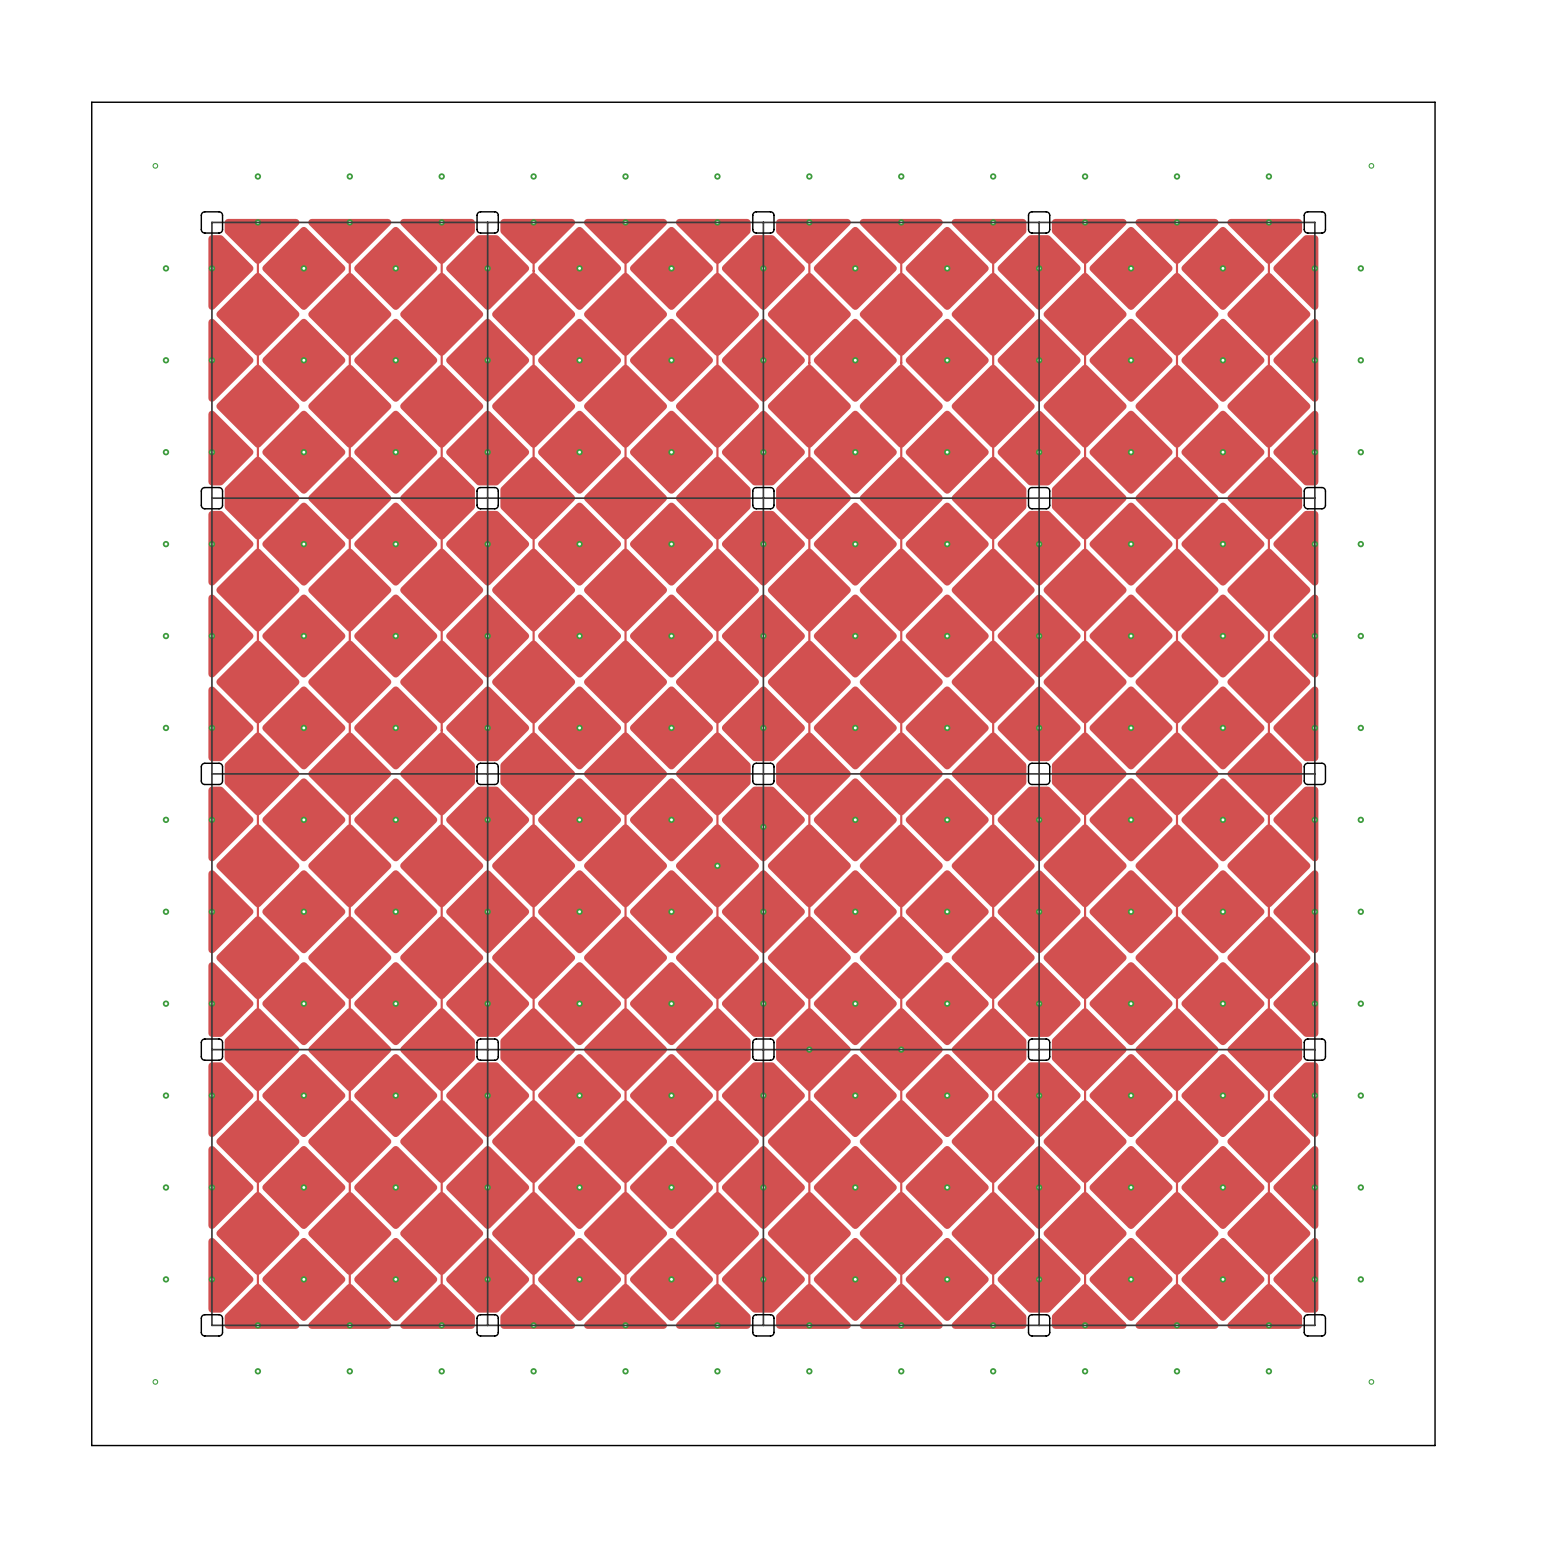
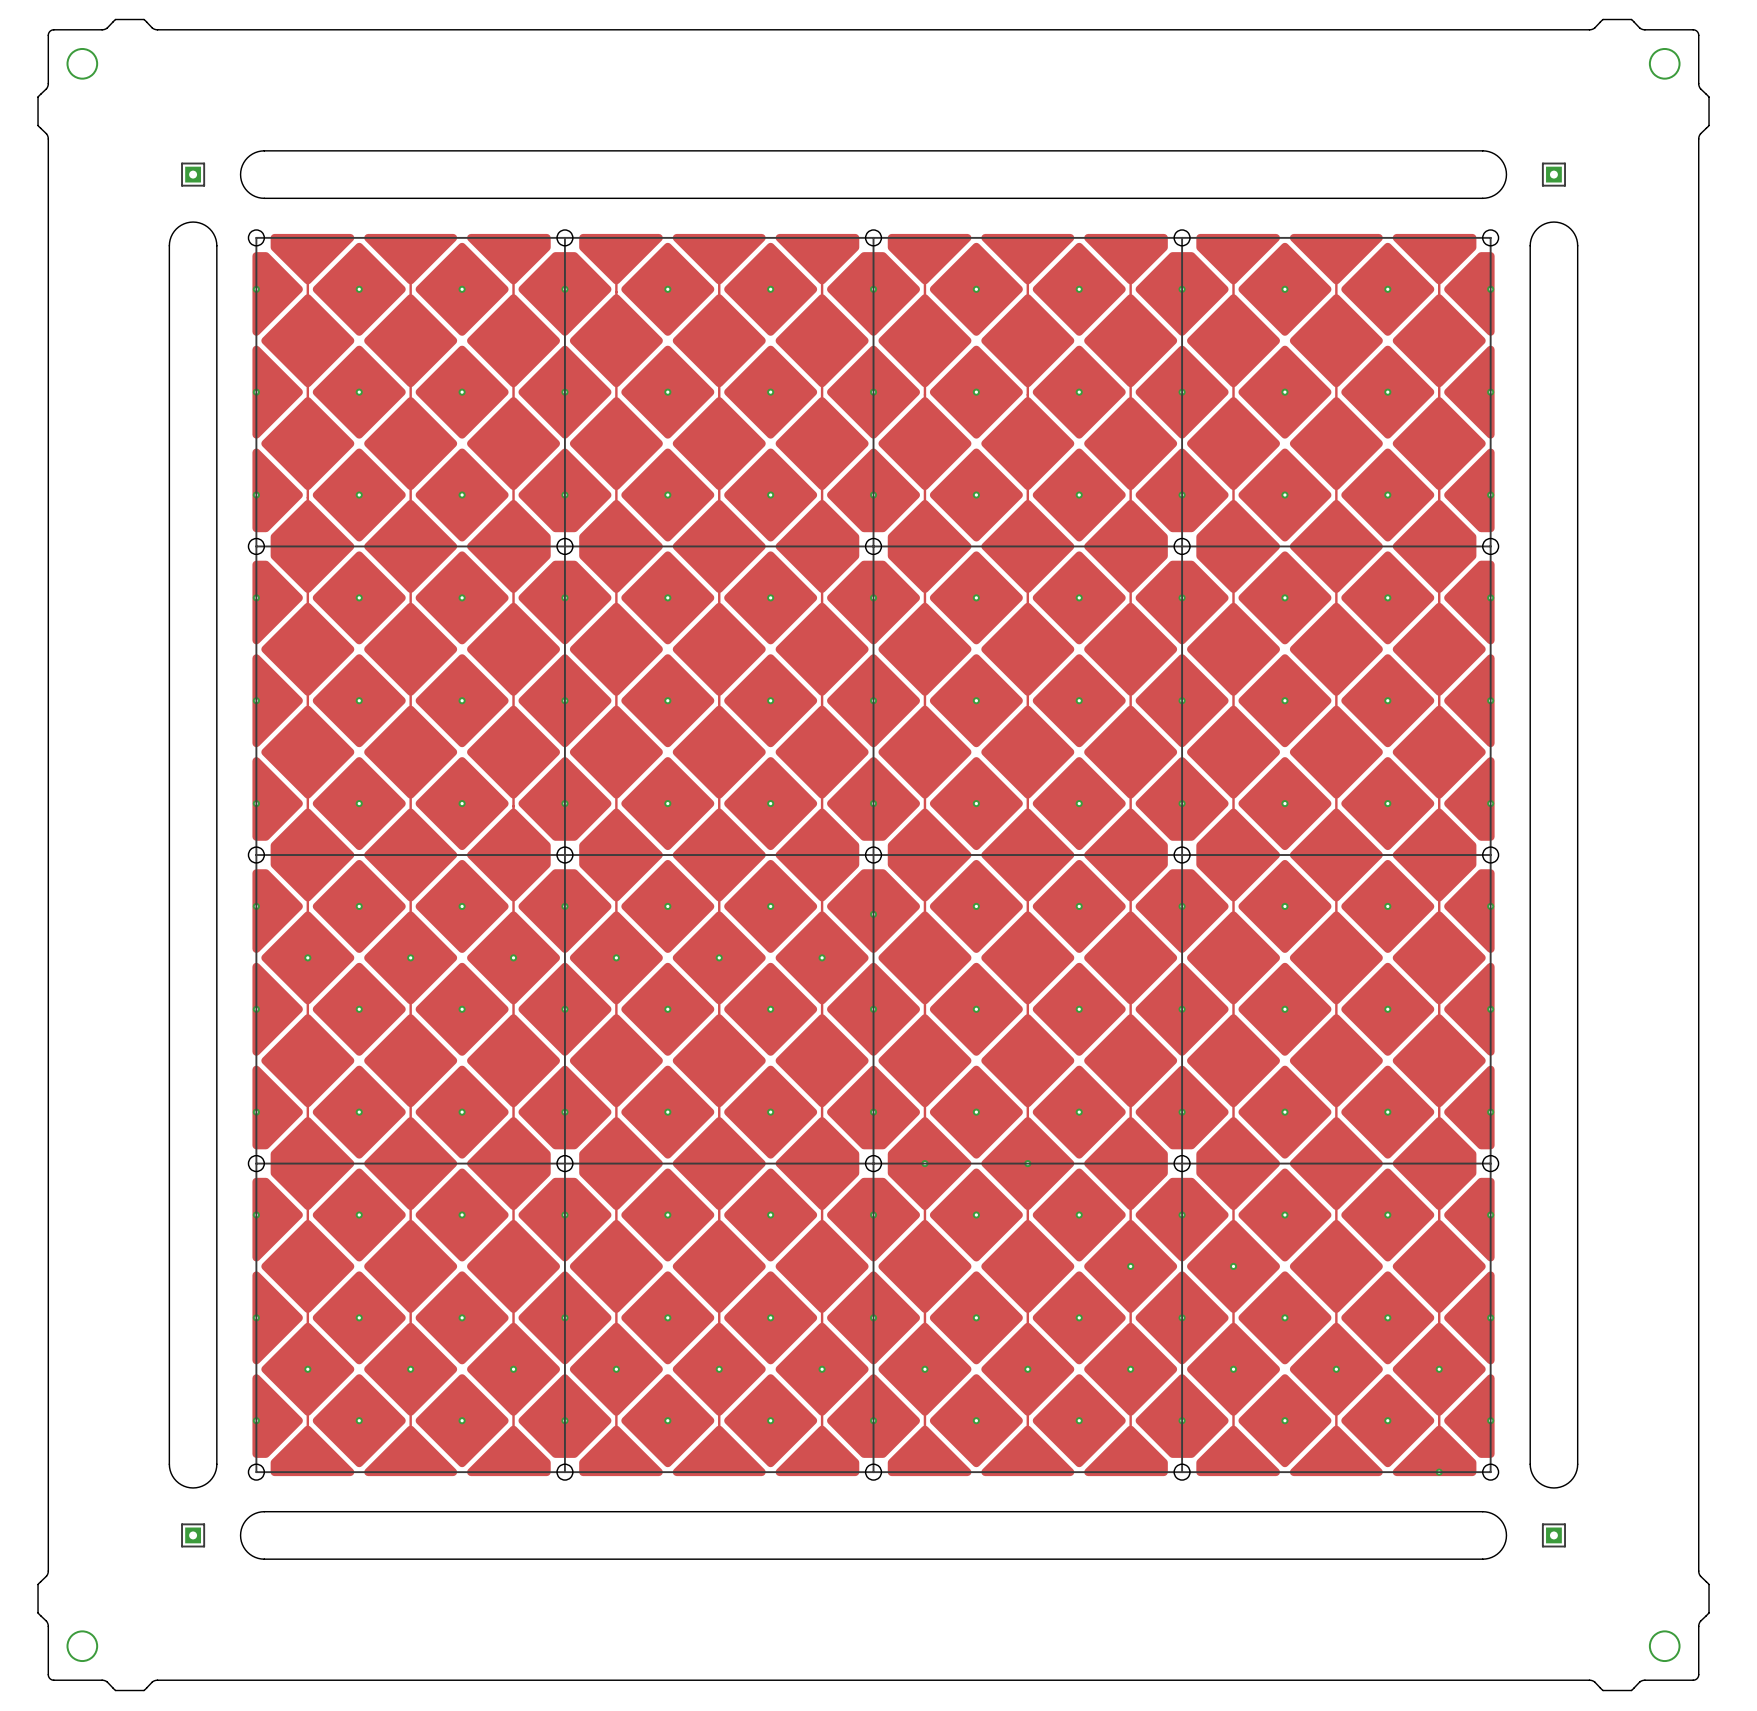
board edge: (91, 102) (1435, 102) (1435, 1445) (91, 1445) (91, 102) -> none
board edge: none -> (264, 150) (1482, 150) (1491, 152) (1499, 157) (1504, 165) (1506, 174) (1504, 183) (1499, 191) (1491, 196) (1482, 198) (264, 198) (255, 196) (247, 191) (242, 183) (240, 174) (242, 165) (247, 157) (255, 152) (264, 150)
via: (155, 165) -> none
part: none -> (193, 174)
via: (1371, 165) -> none
part: none -> (1553, 174)
via: (257, 176) -> none
via: (349, 176) -> none
via: (441, 176) -> none
via: (533, 176) -> none
via: (625, 176) -> none
via: (717, 176) -> none
via: (809, 176) -> none
via: (901, 176) -> none
via: (993, 176) -> none
via: (1085, 176) -> none
via: (1176, 176) -> none
via: (1268, 176) -> none
board edge: (204, 211) (221, 213) (221, 232) (202, 231) (201, 214) (204, 211) -> none
board edge: (480, 211) (497, 213) (496, 232) (477, 231) (477, 214) (480, 211) -> none
board edge: (756, 211) (773, 213) (772, 232) (753, 231) (752, 214) (756, 211) -> none
board edge: (1032, 211) (1048, 213) (1048, 232) (1029, 231) (1028, 214) (1032, 211) -> none
board edge: (1307, 211) (1324, 213) (1324, 232) (1305, 231) (1304, 214) (1307, 211) -> none
round board edge: none -> [248, 229, 265, 247]
round board edge: none -> [556, 229, 574, 247]
round board edge: none -> [865, 229, 882, 247]
round board edge: none -> [1173, 229, 1191, 247]
round board edge: none -> [1482, 229, 1499, 247]
via: (257, 222) -> none
via: (349, 222) -> none
via: (441, 222) -> none
via: (533, 222) -> none
via: (625, 222) -> none
via: (717, 222) -> none
via: (809, 222) -> none
via: (901, 222) -> none
via: (993, 222) -> none
via: (1085, 222) -> none
via: (1176, 222) -> none
via: (1268, 222) -> none
board edge: none -> (169, 245) (169, 1464) (171, 1473) (176, 1481) (184, 1486) (193, 1487) (202, 1486) (209, 1481) (215, 1473) (216, 1464) (216, 245) (215, 236) (209, 229) (202, 223) (193, 222) (184, 223) (176, 229) (171, 236) (169, 245)
board edge: none -> (1530, 245) (1530, 1464) (1532, 1473) (1537, 1481) (1544, 1486) (1553, 1487) (1563, 1486) (1570, 1481) (1575, 1473) (1577, 1464) (1577, 245) (1575, 236) (1570, 229) (1563, 223) (1553, 222) (1544, 223) (1537, 229) (1532, 236) (1530, 245)
via: (165, 268) -> none
via: (1360, 268) -> none
via: (165, 360) -> none
via: (1360, 360) -> none
via: (165, 452) -> none
via: (1360, 452) -> none
board edge: (204, 487) (221, 488) (221, 507) (202, 507) (201, 490) (204, 487) -> none
board edge: (480, 487) (497, 488) (496, 507) (477, 507) (477, 490) (480, 487) -> none
board edge: (756, 487) (773, 488) (772, 507) (753, 507) (752, 490) (756, 487) -> none
board edge: (1032, 487) (1048, 488) (1048, 507) (1029, 507) (1028, 490) (1032, 487) -> none
board edge: (1307, 487) (1324, 488) (1324, 507) (1305, 507) (1304, 490) (1307, 487) -> none
round board edge: none -> [248, 538, 265, 555]
round board edge: none -> [556, 538, 574, 555]
round board edge: none -> [865, 538, 882, 555]
round board edge: none -> [1173, 538, 1191, 555]
round board edge: none -> [1482, 538, 1499, 555]
via: (165, 544) -> none
via: (1360, 544) -> none
via: (165, 636) -> none
via: (1360, 636) -> none
via: (165, 727) -> none
via: (1360, 727) -> none
board edge: (204, 763) (221, 764) (221, 783) (202, 783) (201, 766) (204, 763) -> none
board edge: (480, 763) (497, 764) (496, 783) (477, 783) (477, 766) (480, 763) -> none
board edge: (756, 763) (773, 764) (772, 783) (753, 783) (752, 766) (756, 763) -> none
board edge: (1032, 763) (1048, 764) (1048, 783) (1029, 783) (1028, 766) (1032, 763) -> none
board edge: (1307, 763) (1324, 764) (1324, 783) (1305, 783) (1304, 766) (1307, 763) -> none
round board edge: none -> [248, 846, 265, 864]
round board edge: none -> [556, 846, 574, 864]
round board edge: none -> [865, 846, 882, 864]
round board edge: none -> [1173, 846, 1191, 864]
round board edge: none -> [1482, 846, 1499, 864]
part: none -> (873, 855)
via: (165, 819) -> none
via: (1360, 819) -> none
via: none -> (307, 957)
via: none -> (410, 957)
via: none -> (513, 957)
via: none -> (616, 957)
via: none -> (719, 957)
via: (165, 911) -> none
via: (1360, 911) -> none
via: (165, 1003) -> none
via: (1360, 1003) -> none
board edge: (204, 1039) (221, 1040) (221, 1059) (202, 1058) (201, 1042) (204, 1039) -> none
board edge: (480, 1039) (497, 1040) (496, 1059) (477, 1058) (477, 1042) (480, 1039) -> none
board edge: (756, 1039) (773, 1040) (772, 1059) (753, 1058) (752, 1042) (756, 1039) -> none
board edge: (1032, 1039) (1048, 1040) (1048, 1059) (1029, 1058) (1028, 1042) (1032, 1039) -> none
board edge: (1307, 1039) (1324, 1040) (1324, 1059) (1305, 1058) (1304, 1042) (1307, 1039) -> none
round board edge: none -> [248, 1155, 265, 1172]
round board edge: none -> [556, 1155, 574, 1172]
round board edge: none -> [865, 1155, 882, 1172]
round board edge: none -> [1173, 1155, 1191, 1172]
round board edge: none -> [1482, 1155, 1499, 1172]
via: (165, 1095) -> none
via: (1360, 1095) -> none
via: none -> (1130, 1266)
via: none -> (1233, 1266)
via: (165, 1187) -> none
via: (1360, 1187) -> none
via: none -> (307, 1369)
via: none -> (410, 1369)
via: none -> (513, 1369)
via: none -> (616, 1369)
via: none -> (719, 1369)
via: none -> (822, 1369)
via: none -> (924, 1369)
via: none -> (1027, 1369)
via: none -> (1130, 1369)
via: none -> (1233, 1369)
via: none -> (1336, 1369)
via: none -> (1439, 1369)
via: (165, 1279) -> none
via: (1360, 1279) -> none
board edge: (204, 1314) (221, 1316) (221, 1335) (202, 1334) (201, 1317) (204, 1314) -> none
board edge: (480, 1314) (497, 1316) (496, 1335) (477, 1334) (477, 1317) (480, 1314) -> none
board edge: (756, 1314) (773, 1316) (772, 1335) (753, 1334) (752, 1317) (756, 1314) -> none
board edge: (1032, 1314) (1048, 1316) (1048, 1335) (1029, 1334) (1028, 1317) (1032, 1314) -> none
board edge: (1307, 1314) (1324, 1316) (1324, 1335) (1305, 1334) (1304, 1317) (1307, 1314) -> none
round board edge: none -> [248, 1463, 265, 1481]
round board edge: none -> [556, 1463, 574, 1481]
round board edge: none -> [865, 1463, 882, 1481]
round board edge: none -> [1173, 1463, 1191, 1481]
round board edge: none -> [1482, 1463, 1499, 1481]
via: (257, 1325) -> none
via: (349, 1325) -> none
via: (441, 1325) -> none
via: (533, 1325) -> none
via: (625, 1325) -> none
via: (717, 1325) -> none
via: (809, 1325) -> none
via: (901, 1325) -> none
via: (993, 1325) -> none
via: (1085, 1325) -> none
via: (1176, 1325) -> none
board edge: none -> (264, 1511) (1482, 1511) (1491, 1513) (1499, 1518) (1504, 1526) (1506, 1535) (1504, 1544) (1499, 1552) (1491, 1557) (1482, 1559) (264, 1559) (255, 1557) (247, 1552) (242, 1544) (240, 1535) (242, 1526) (247, 1518) (255, 1513) (264, 1511)
via: (257, 1371) -> none
via: (349, 1371) -> none
via: (441, 1371) -> none
via: (533, 1371) -> none
via: (625, 1371) -> none
via: (717, 1371) -> none
via: (809, 1371) -> none
via: (901, 1371) -> none
via: (993, 1371) -> none
via: (1085, 1371) -> none
via: (1176, 1371) -> none
via: (1268, 1371) -> none
via: (155, 1381) -> none
part: none -> (193, 1535)
via: (1371, 1381) -> none
part: none -> (1553, 1535)

